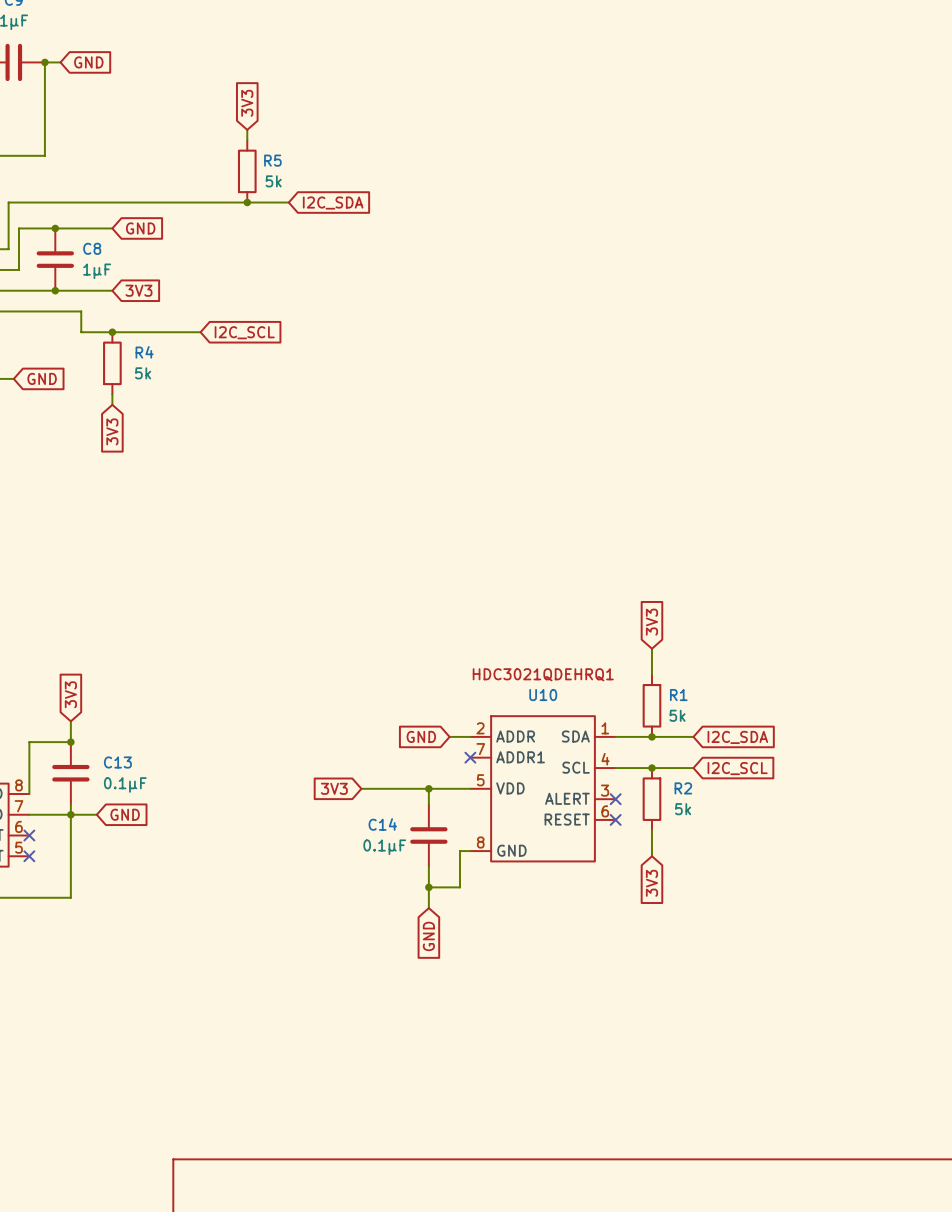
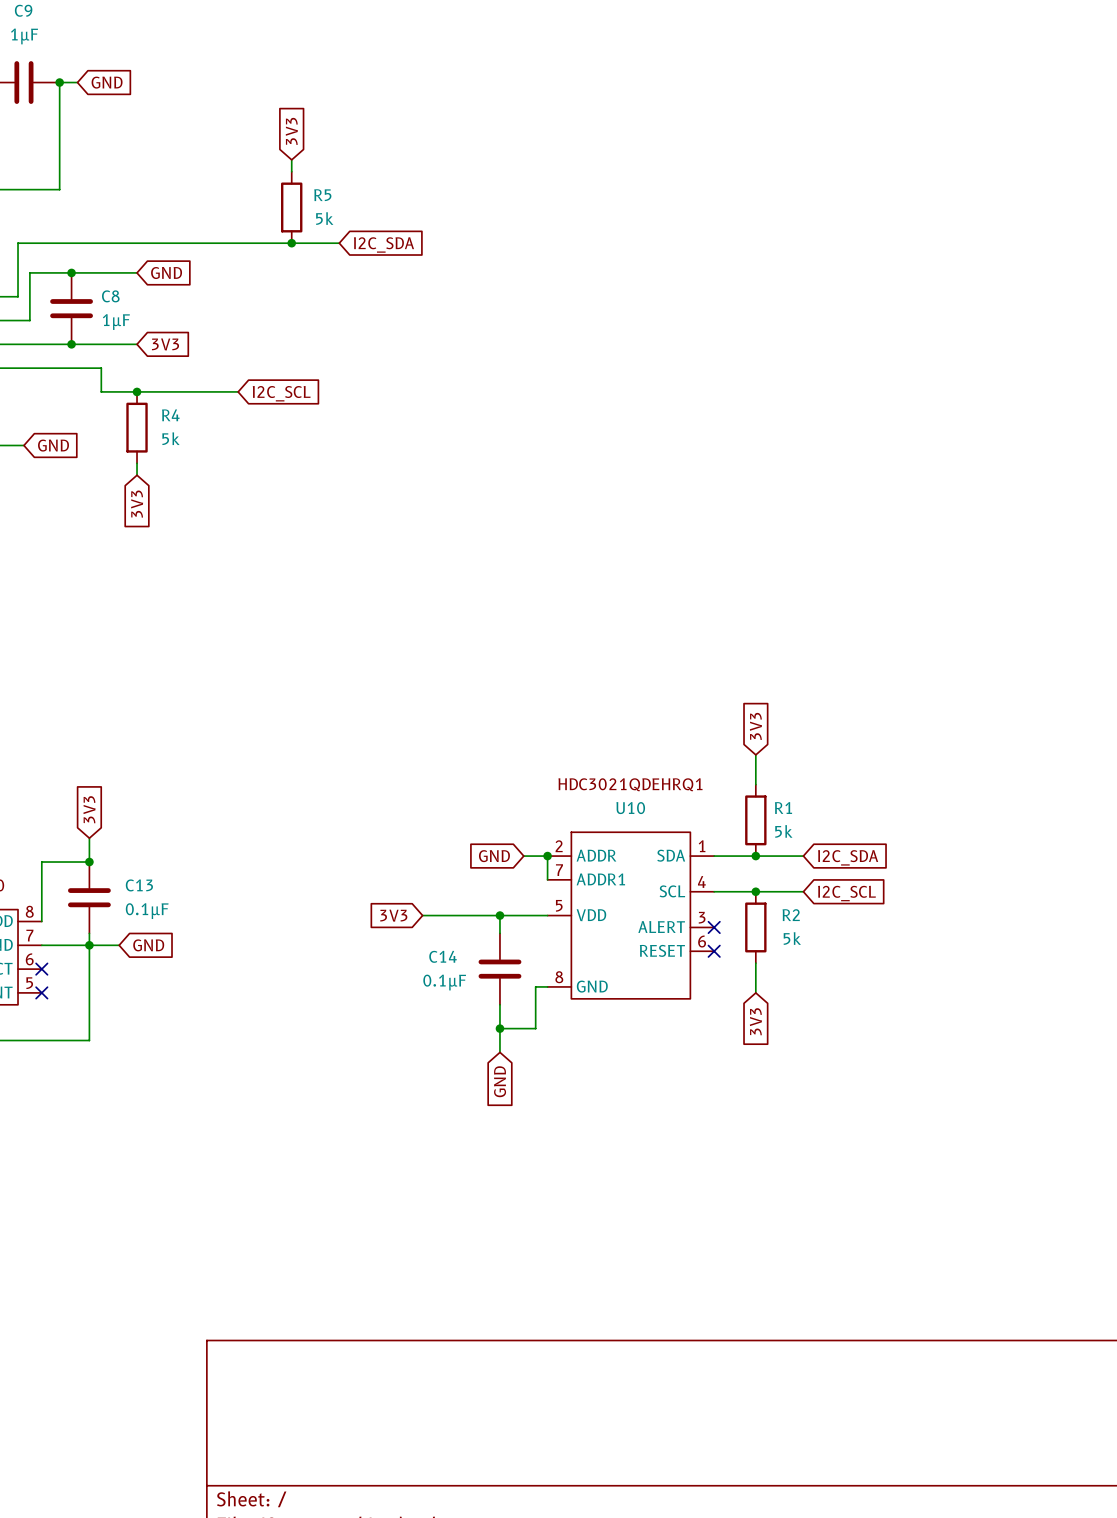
wire: none -> (547, 856) (547, 879)
junction: none -> (547, 856)
no-connect mark: (470, 757) -> none

